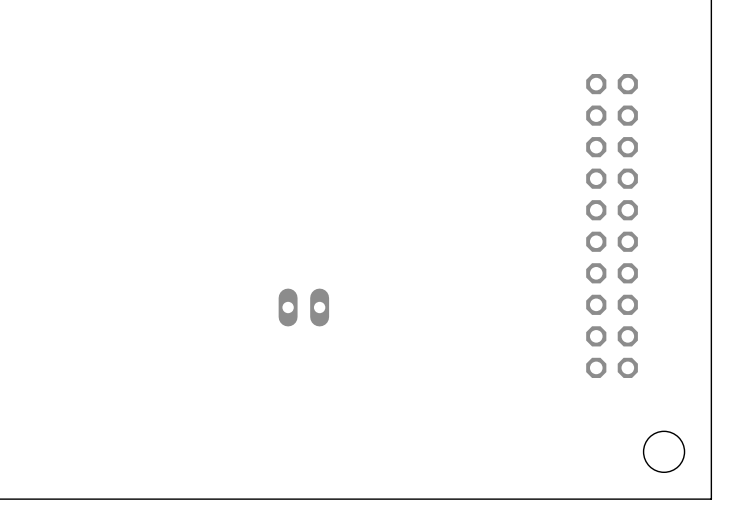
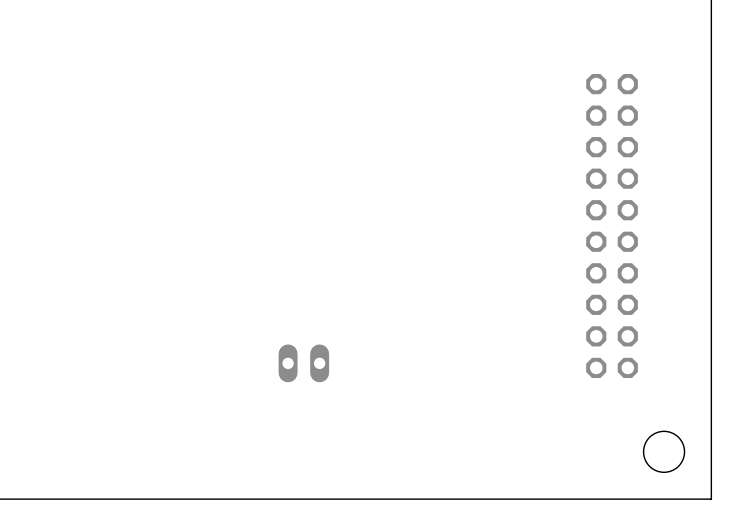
part position: (303, 307) -> (303, 363)

